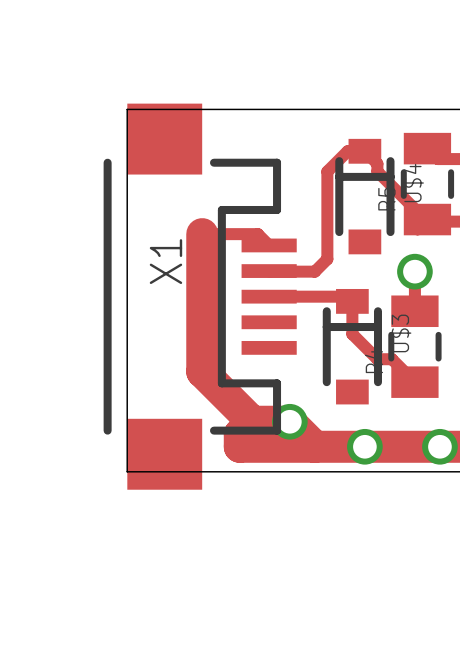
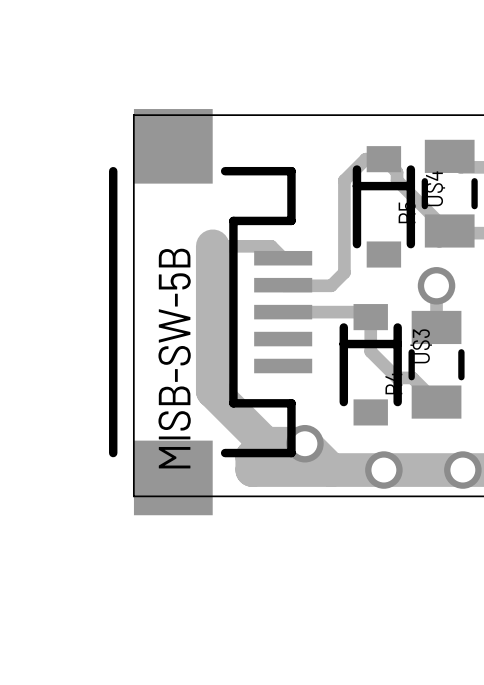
X1 name: X1 (165, 261) -> MISB-SW-5B (174, 358)

